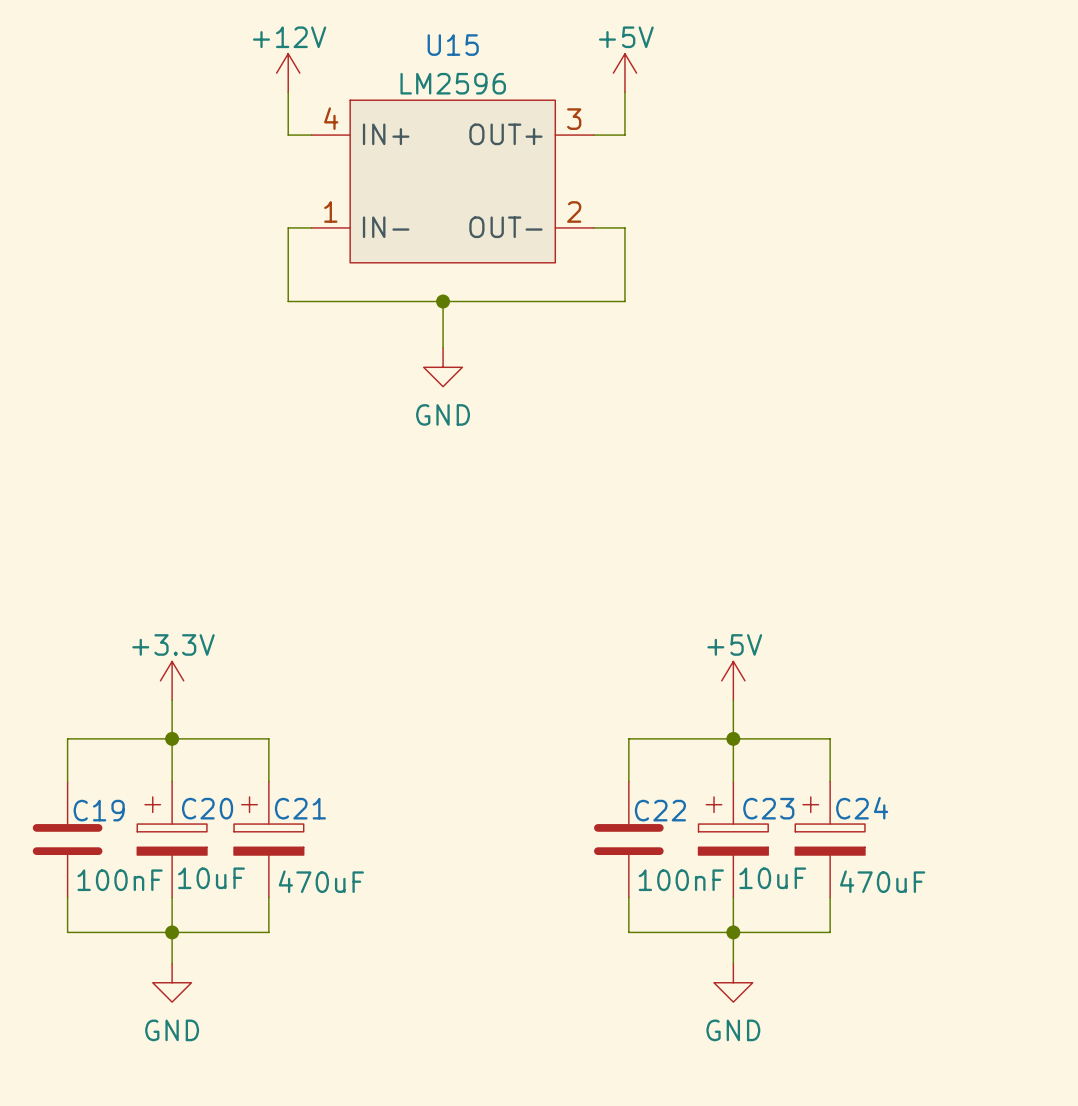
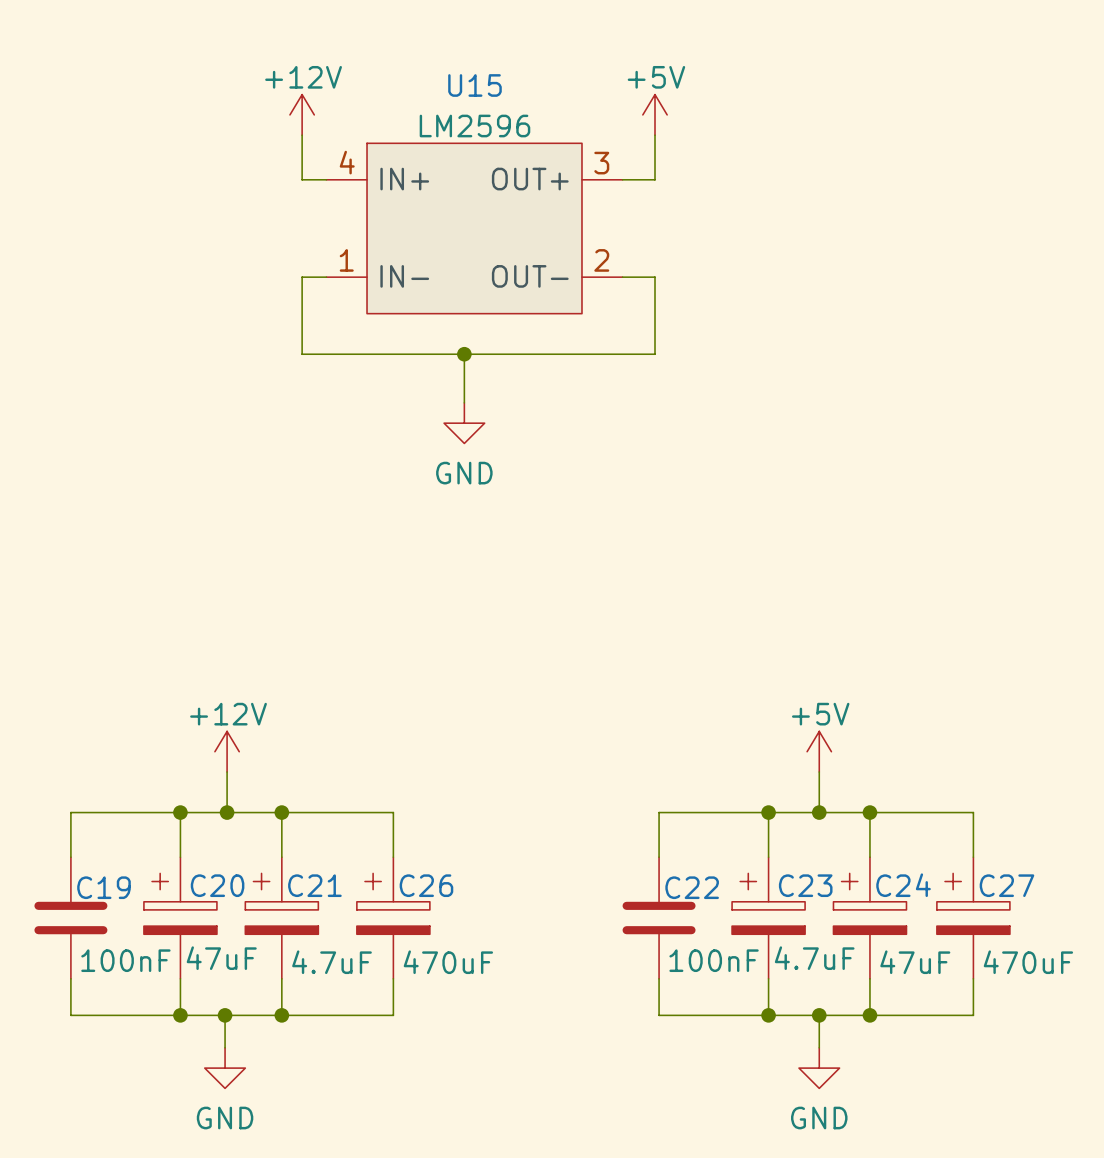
power symbol: +3.3V (172, 680) -> none
power symbol: none -> +12V (227, 751)
power symbol position: +5V (733, 680) -> +5V (819, 751)
wire: (172, 700) (172, 738) -> (227, 772) (227, 812)
wire: (733, 700) (733, 738) -> (819, 772) (819, 812)
junction: none -> (227, 812)
wire: none -> (281, 812) (393, 812) (393, 857)
junction: none -> (281, 812)
junction: none -> (819, 812)
wire: none -> (869, 812) (973, 812) (973, 857)
junction: none -> (869, 812)
C26: none -> 470uF (393, 918)
C27: none -> 470uF (973, 918)
C20 value: 10uF (211, 878) -> 47uF (221, 958)
C23 value: 10uF (772, 878) -> 4.7uF (814, 958)
C21 value: 470uF (321, 881) -> 4.7uF (332, 962)
C24 value: 470uF (882, 881) -> 47uF (915, 962)
wire: none -> (393, 978) (393, 1015) (281, 1015)
wire: none -> (973, 978) (973, 1015) (869, 1015)
wire: (172, 932) (172, 963) -> (225, 1015) (225, 1047)
junction: none -> (225, 1015)
junction: none -> (281, 1015)
wire: (733, 932) (733, 963) -> (819, 1015) (819, 1047)
junction: none -> (819, 1015)
junction: none -> (869, 1015)
power symbol position: GND (172, 982) -> GND (225, 1068)
power symbol position: GND (733, 982) -> GND (819, 1068)

